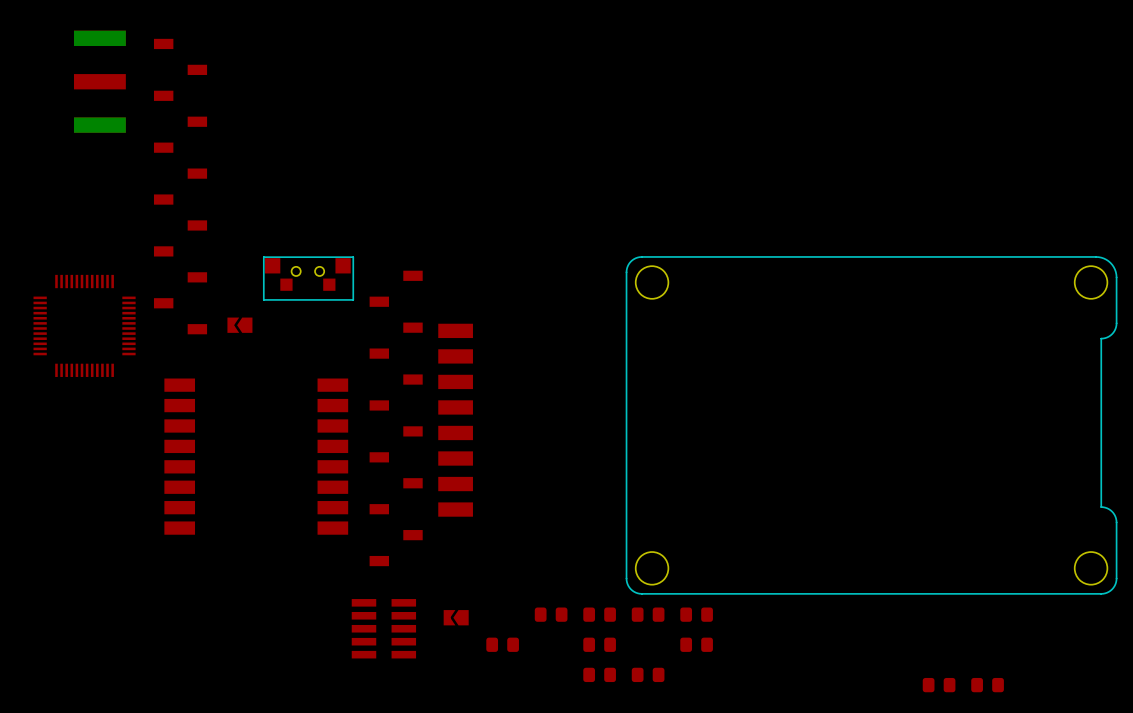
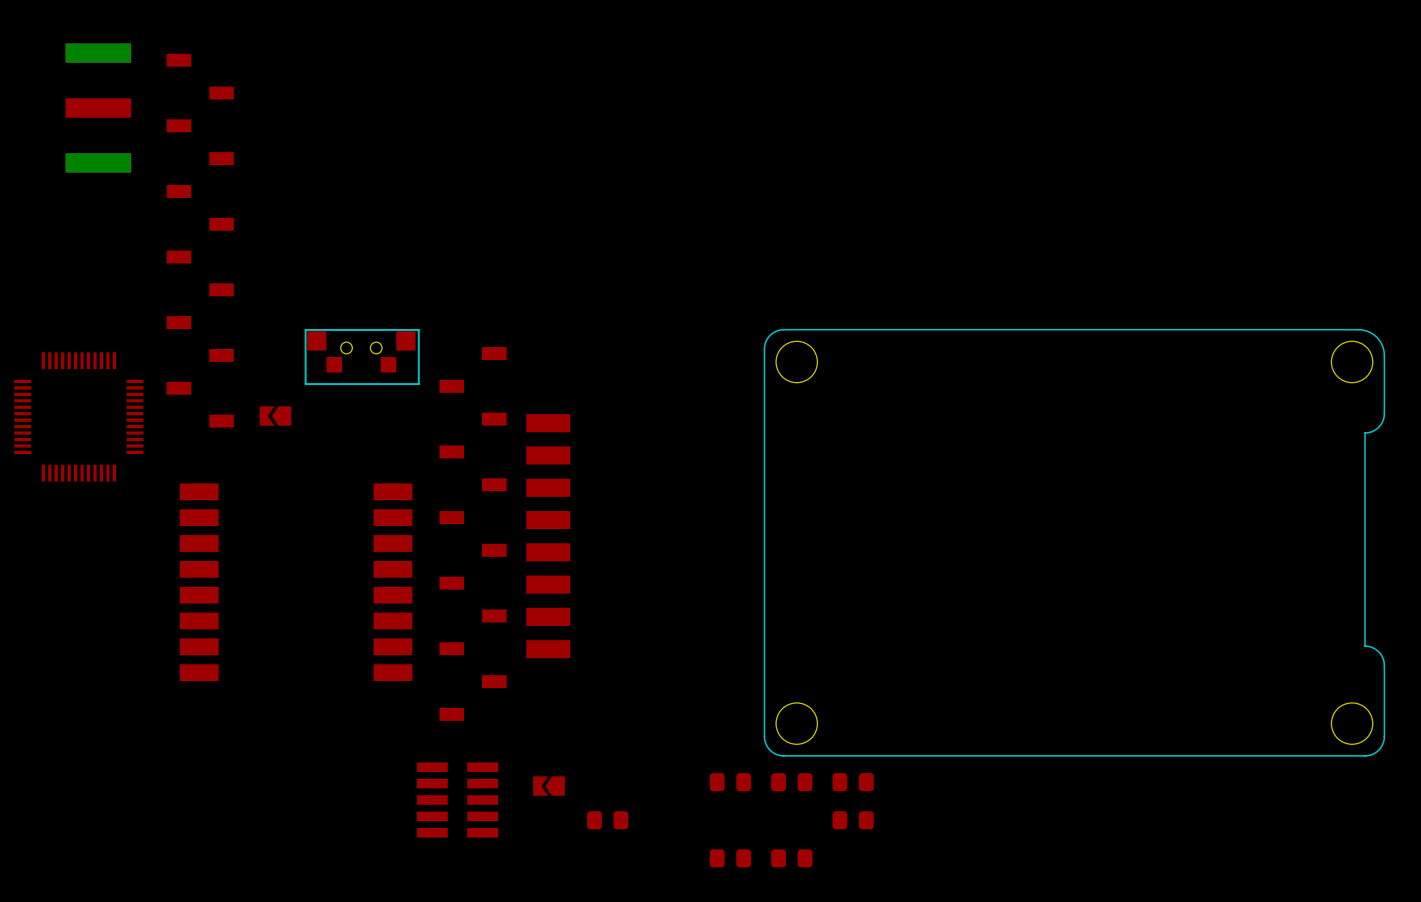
part: (551, 614) -> none
part: (599, 644) -> none
part: (939, 685) -> none
part: (987, 685) -> none

